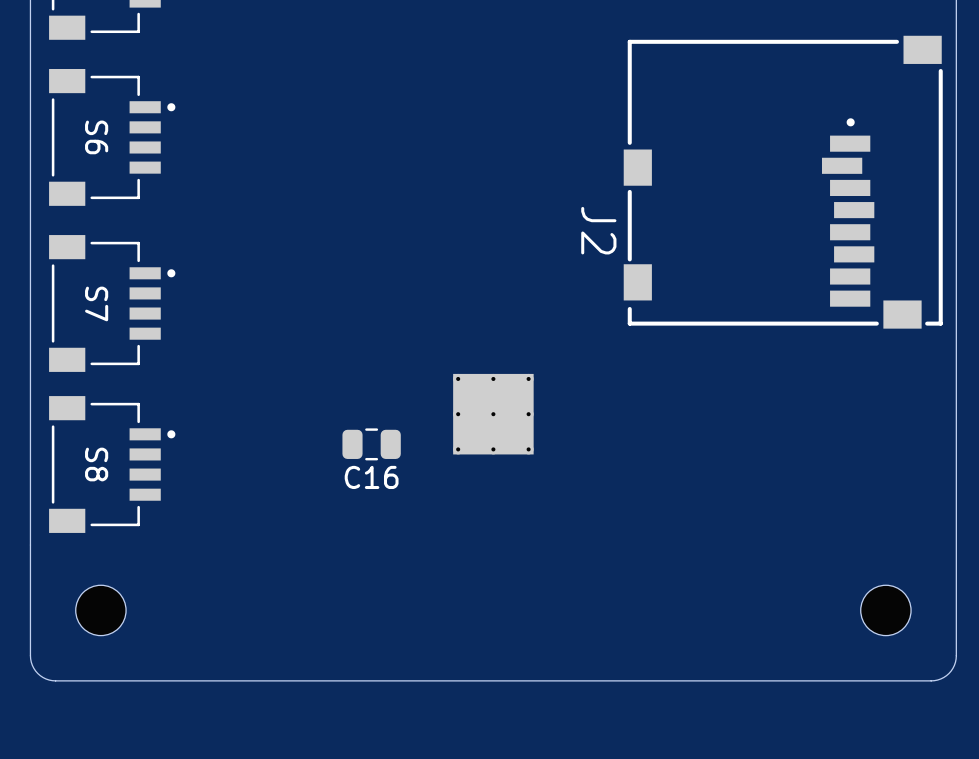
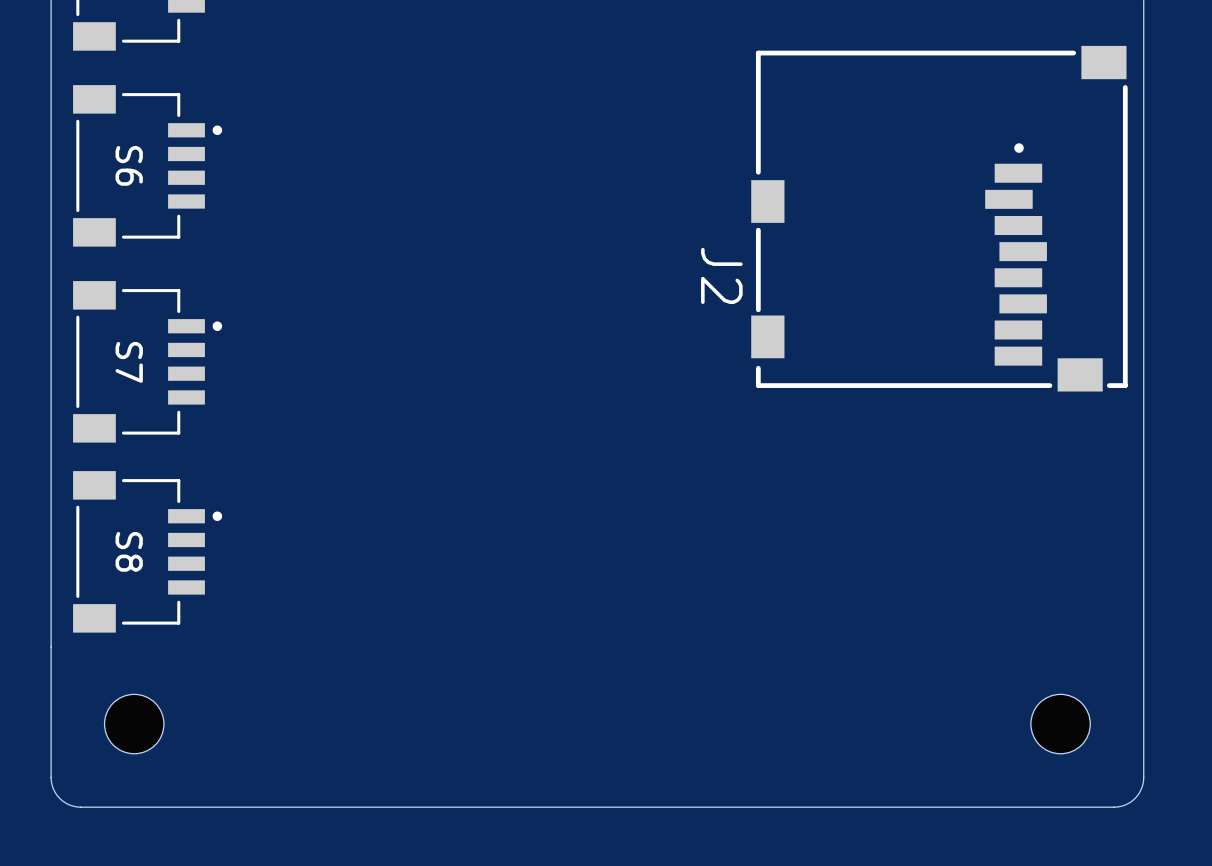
part: (493, 414) -> none
C16: (371, 444) -> none

